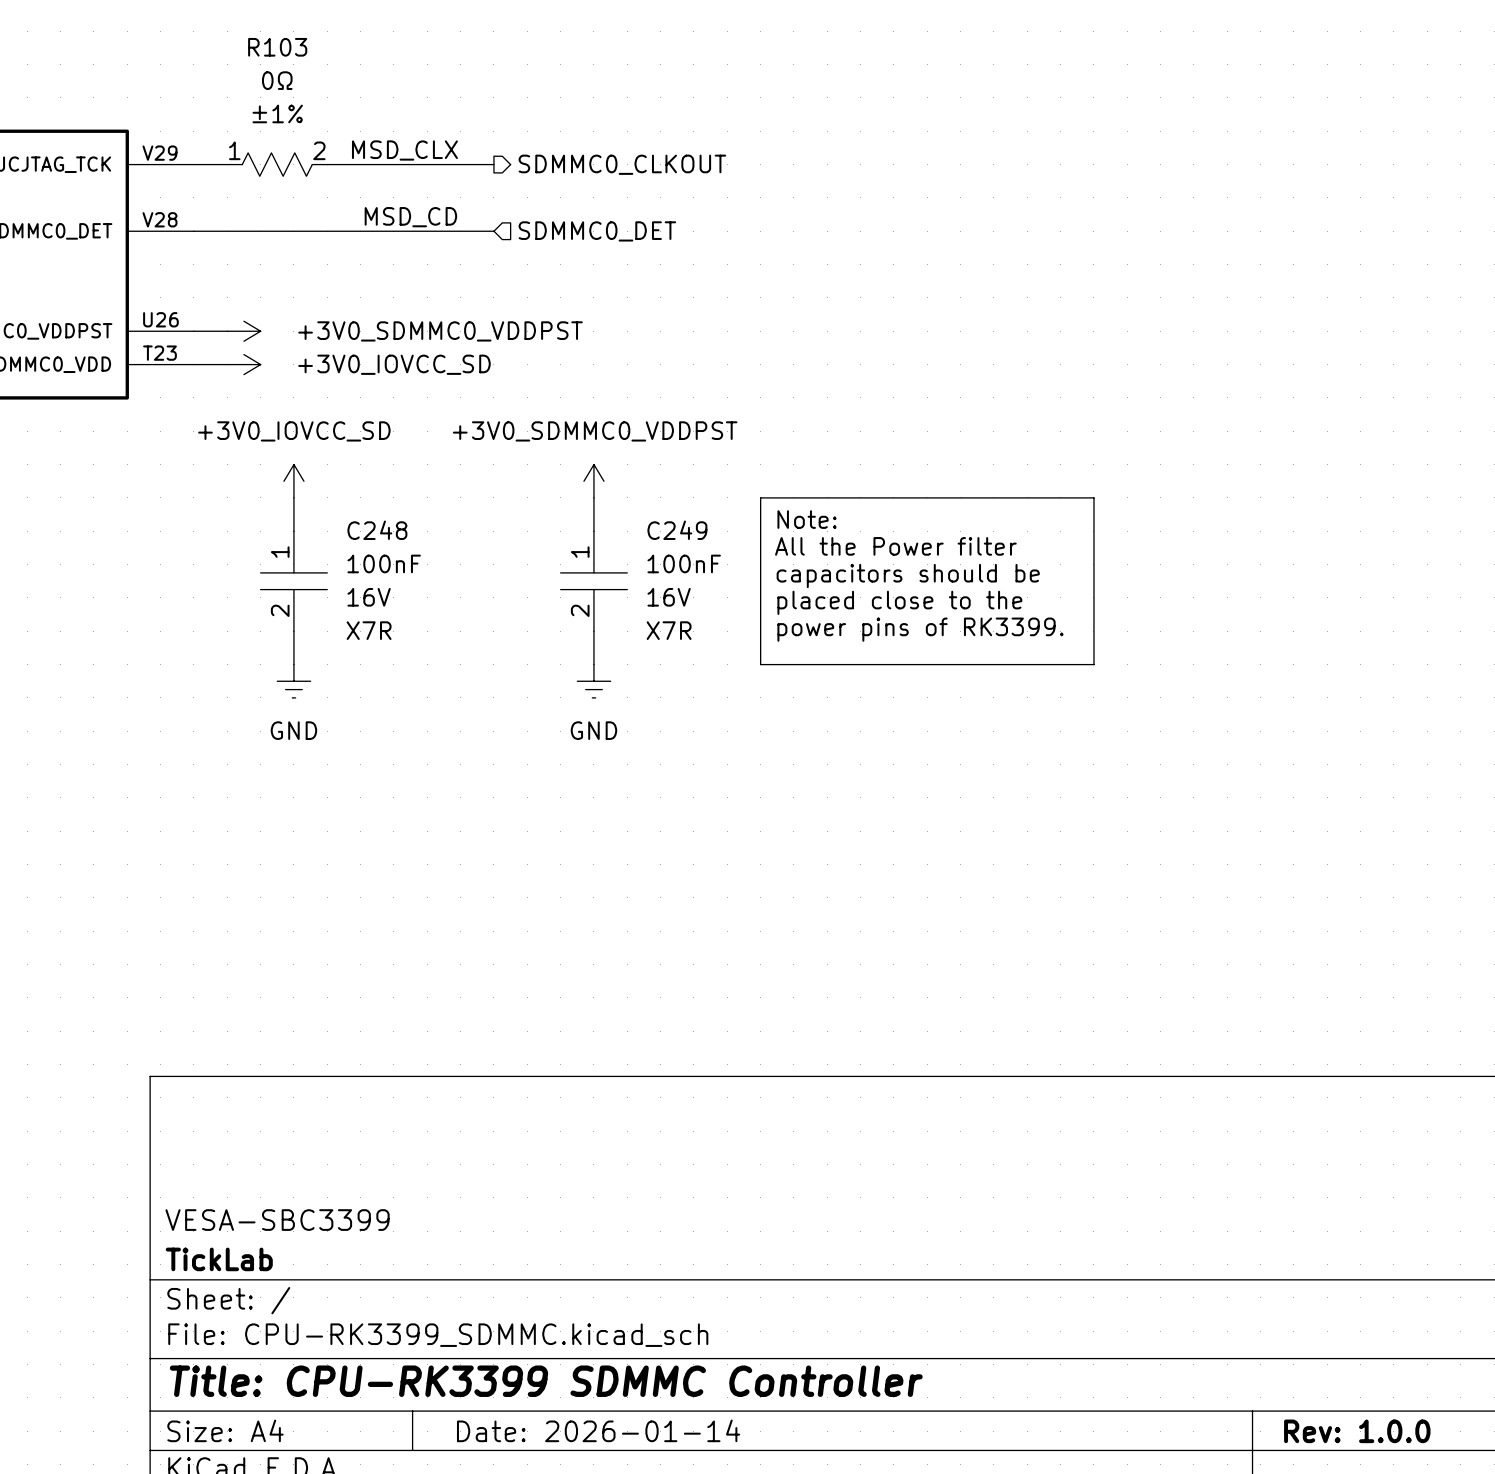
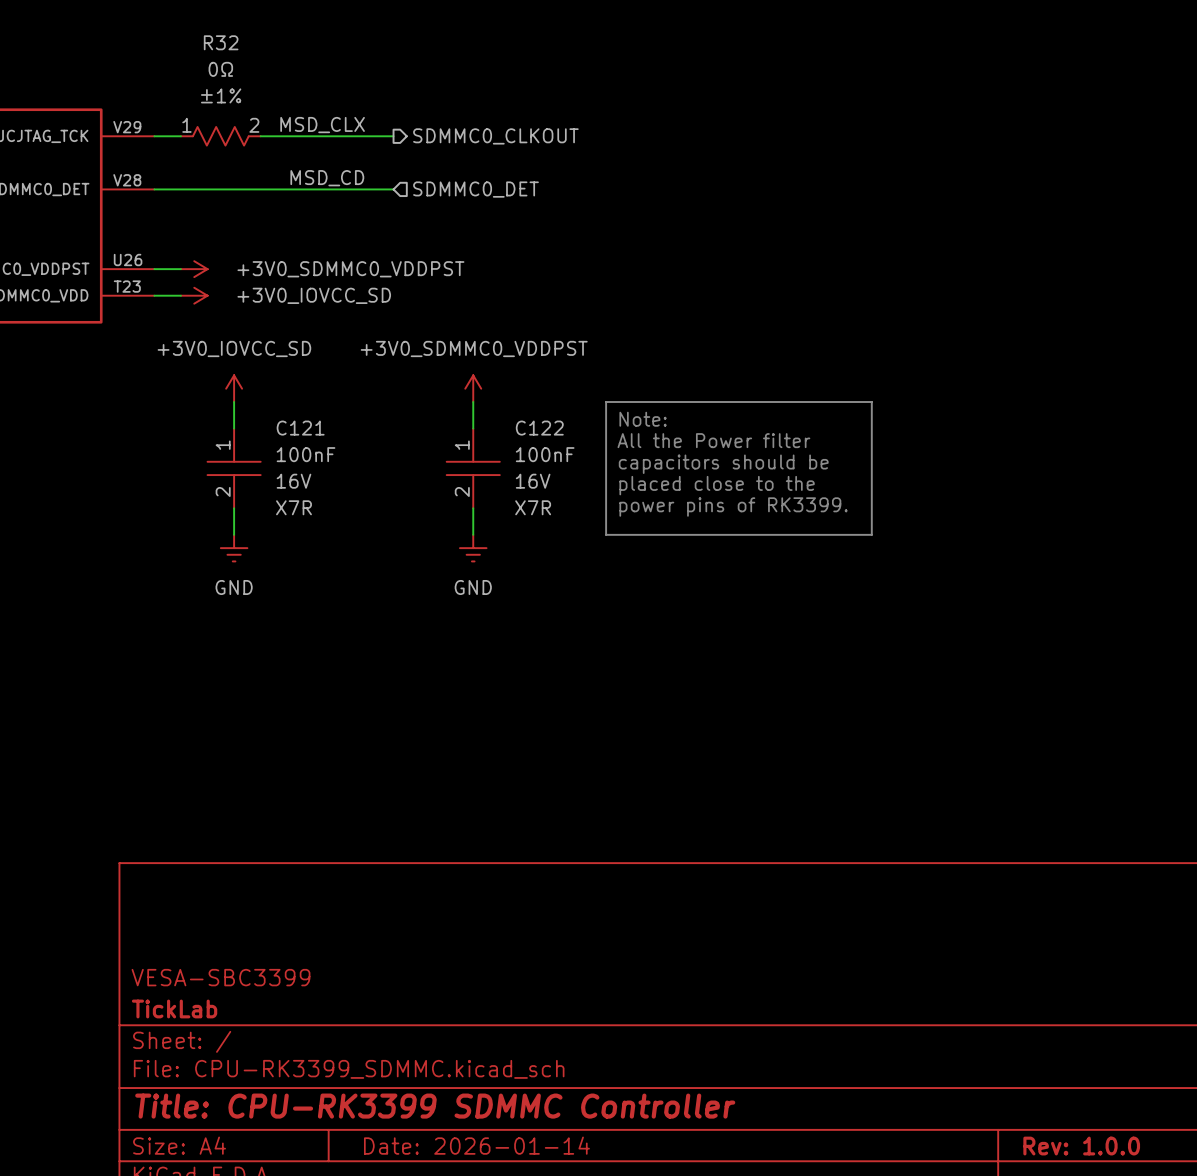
R103 name: R103 (277, 47) -> R32 (221, 42)
C248 name: C248 (377, 530) -> C121 (300, 428)
C249 name: C249 (677, 530) -> C122 (539, 428)

